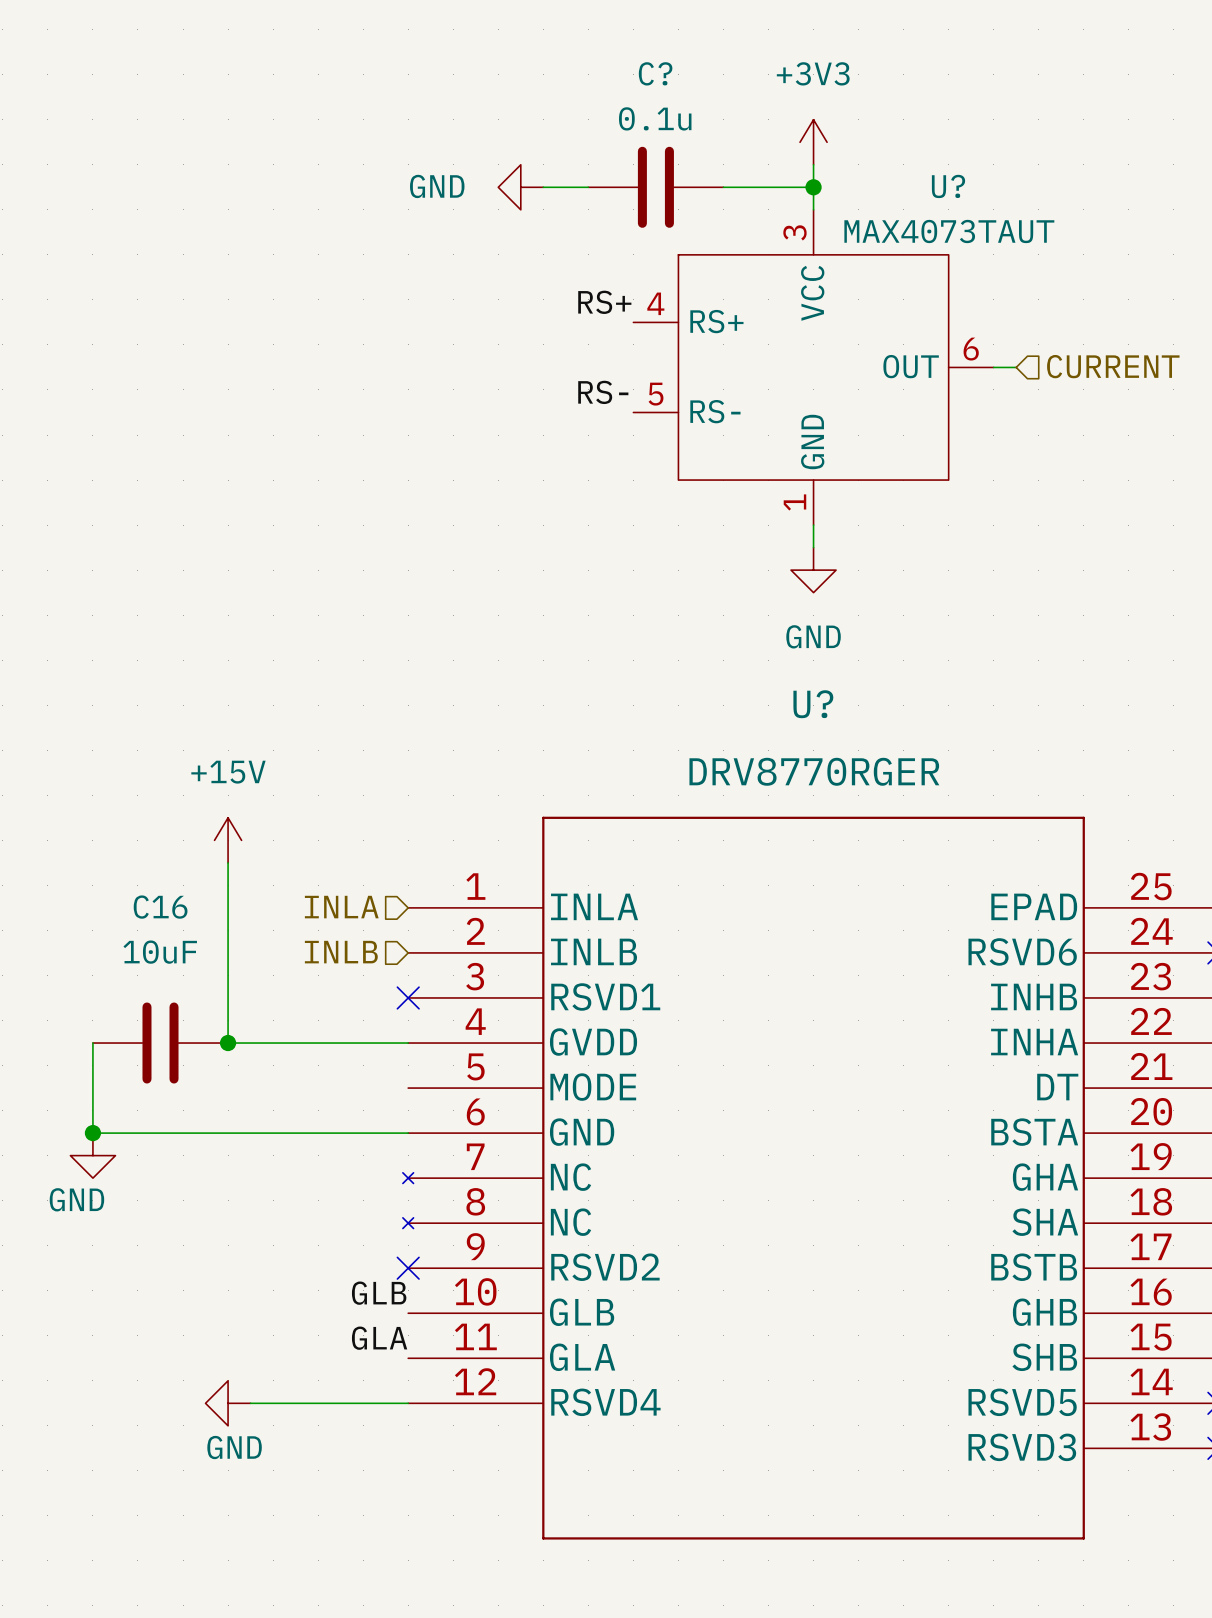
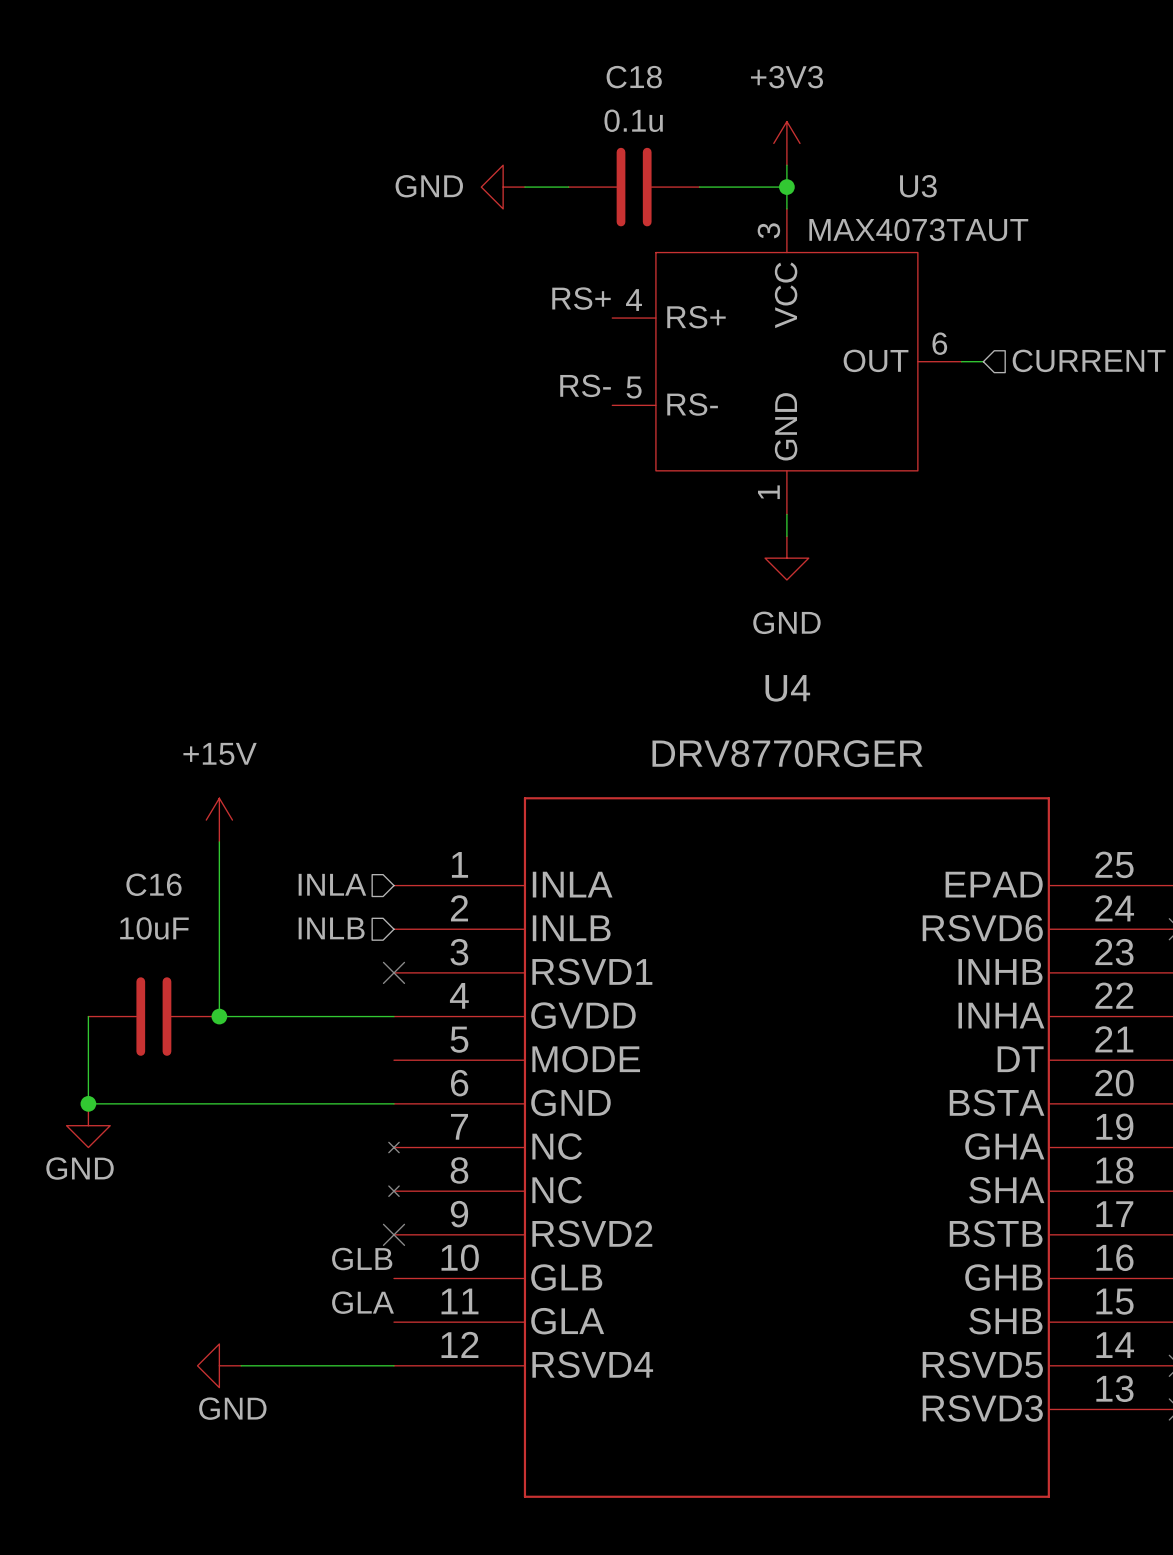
C? name: C? (655, 73) -> C18 (634, 77)
U? name: U? (948, 186) -> U3 (918, 186)
U? name: U? (813, 704) -> U4 (787, 688)

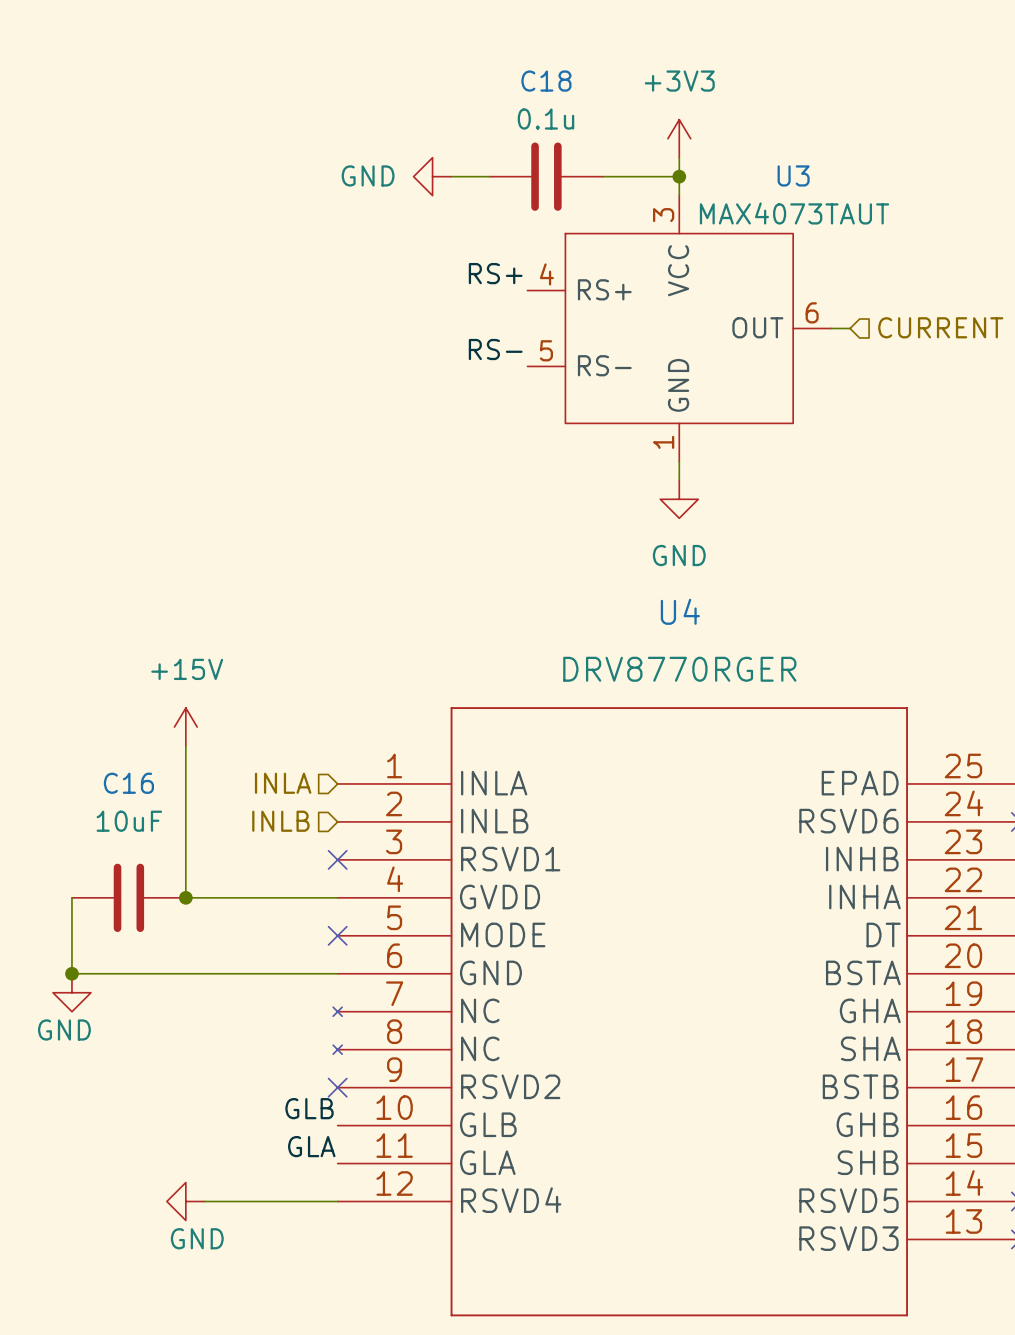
no-connect mark: none -> (337, 935)

